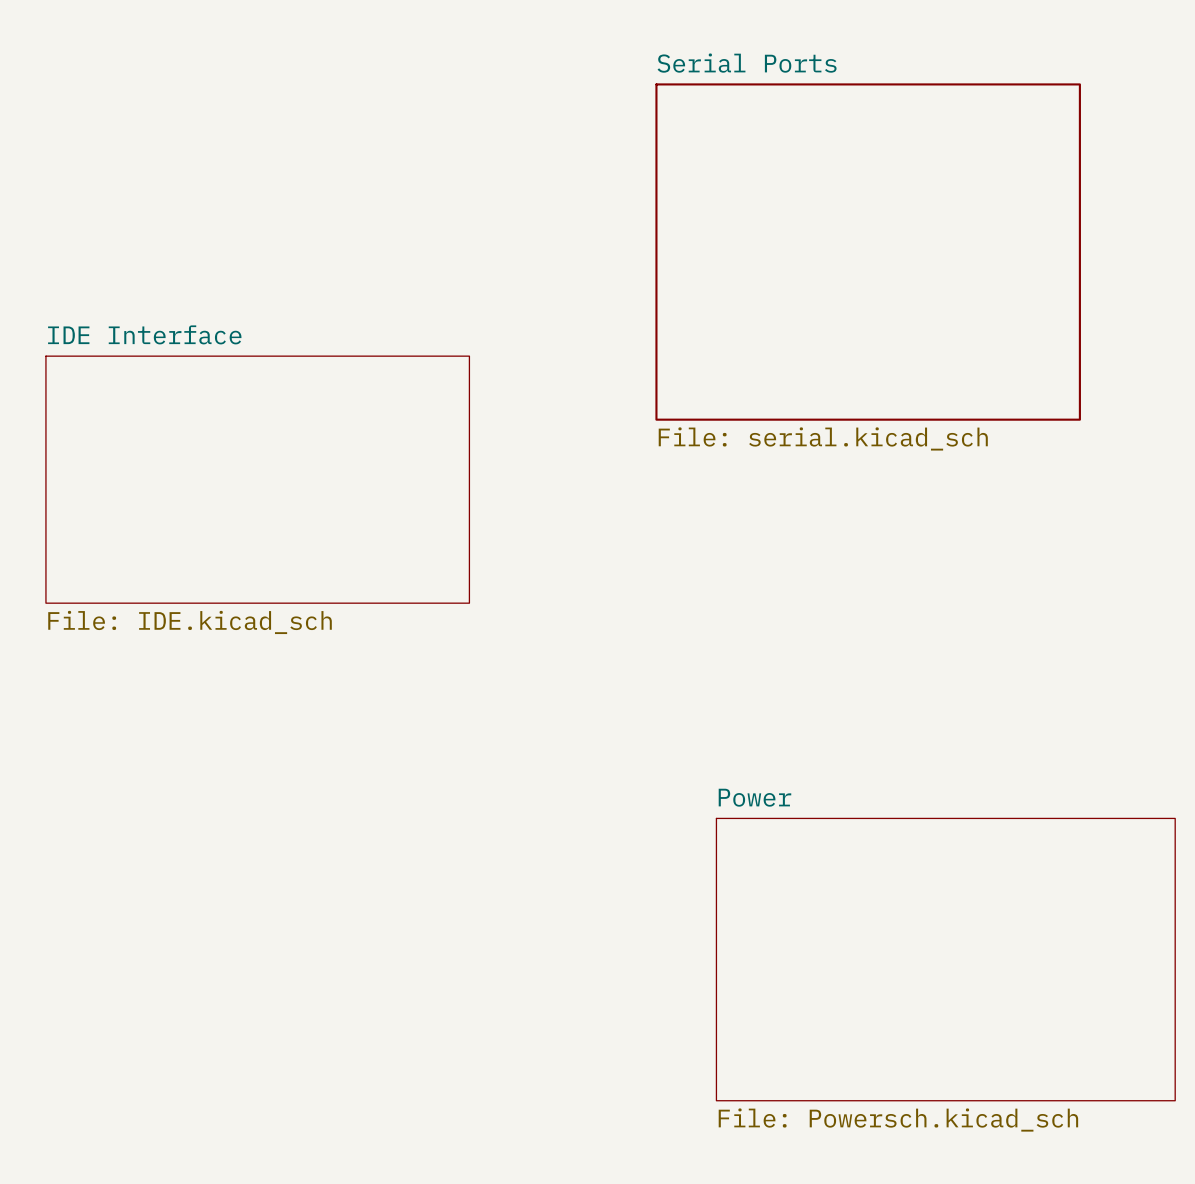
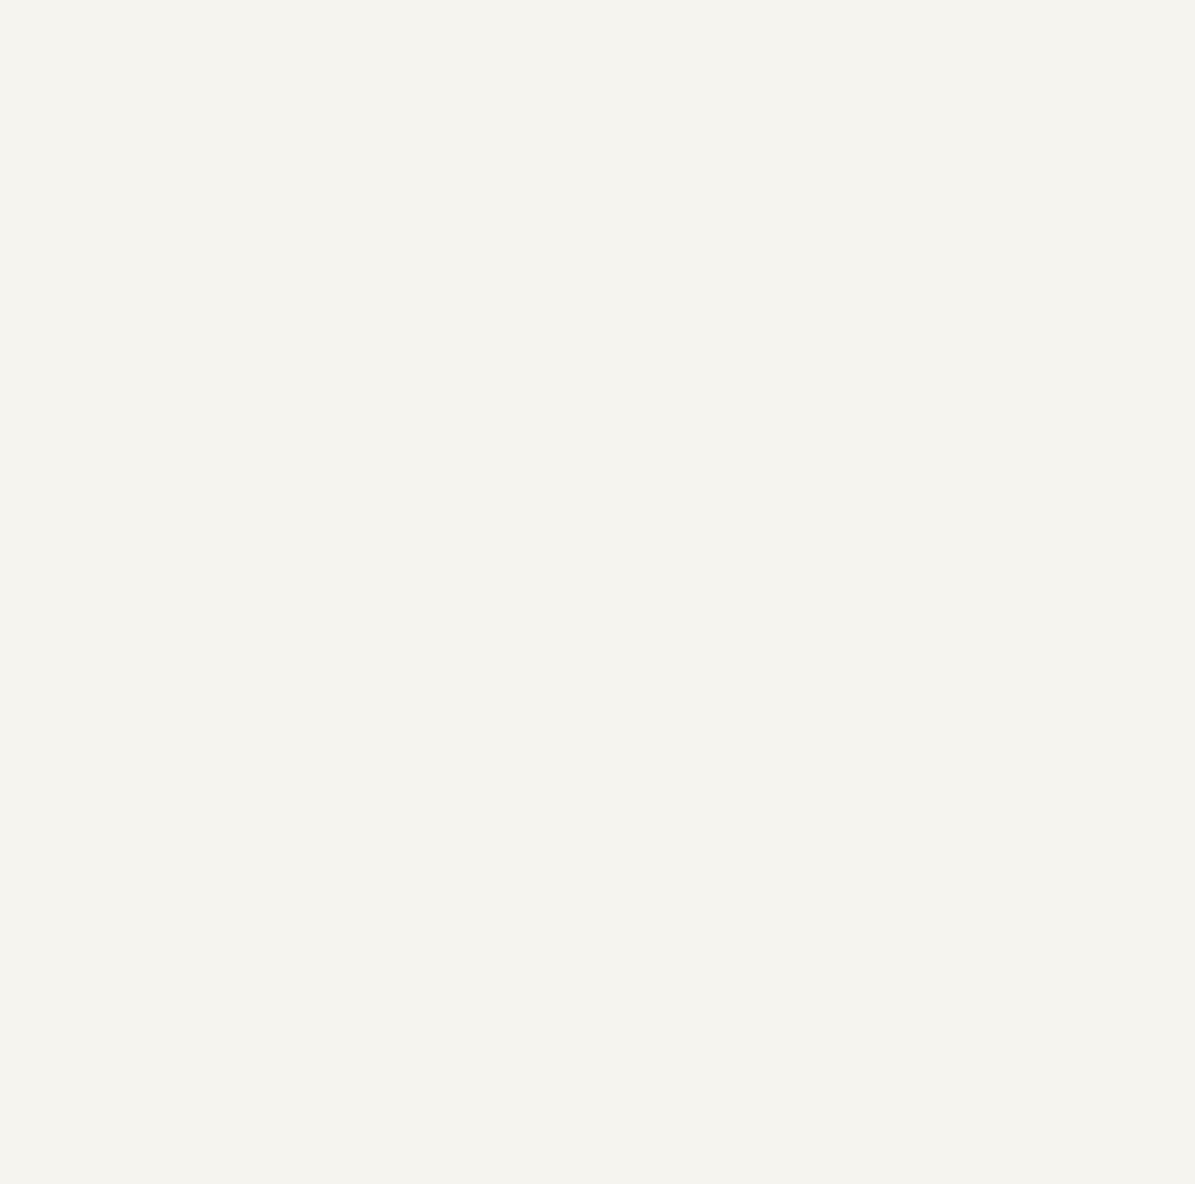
sheet Serial Ports: File: serial.kicad_sch (868, 252) -> none
sheet IDE Interface: File: IDE.kicad_sch (257, 479) -> none
sheet Power: File: Powersch.kicad_sch (945, 959) -> none

